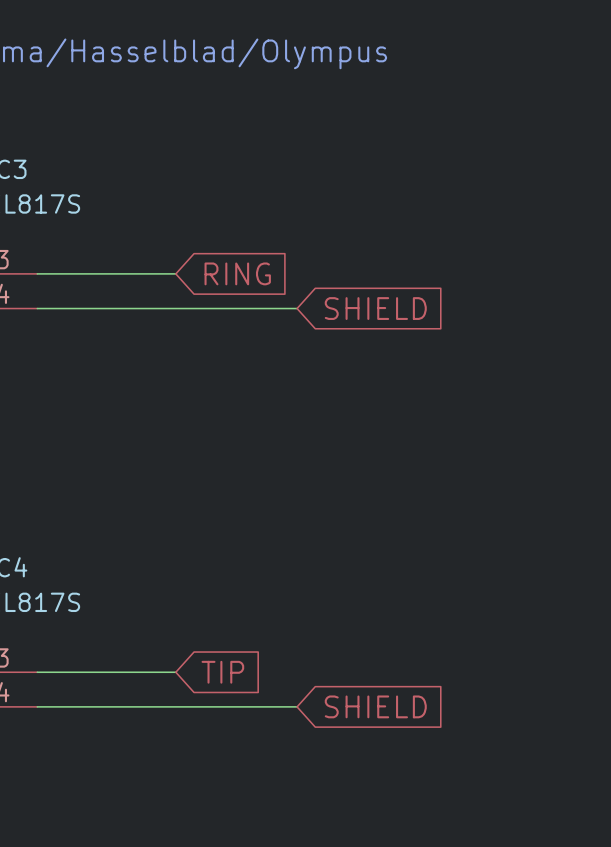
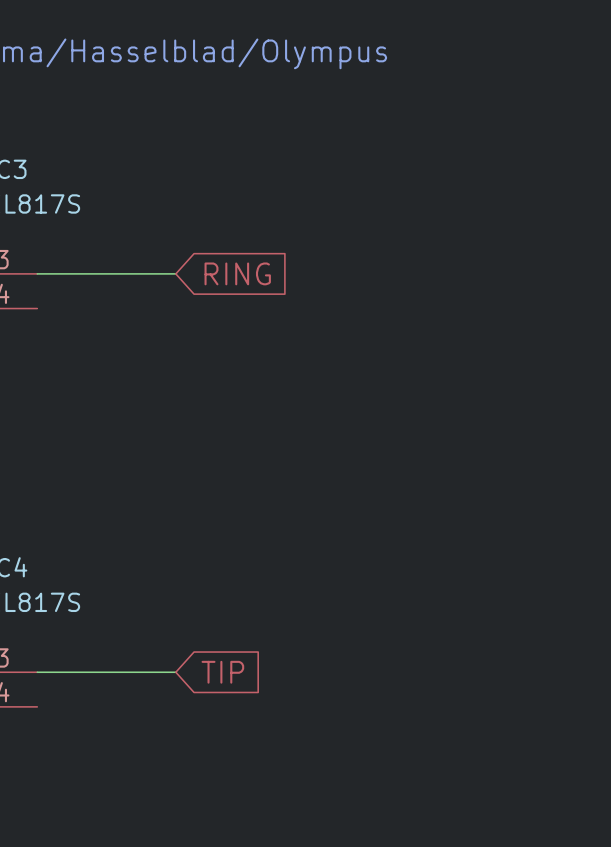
wire: (37, 308) (297, 308) -> none
global label: SHIELD (375, 308) -> none
wire: (37, 706) (297, 706) -> none
global label: SHIELD (375, 706) -> none

